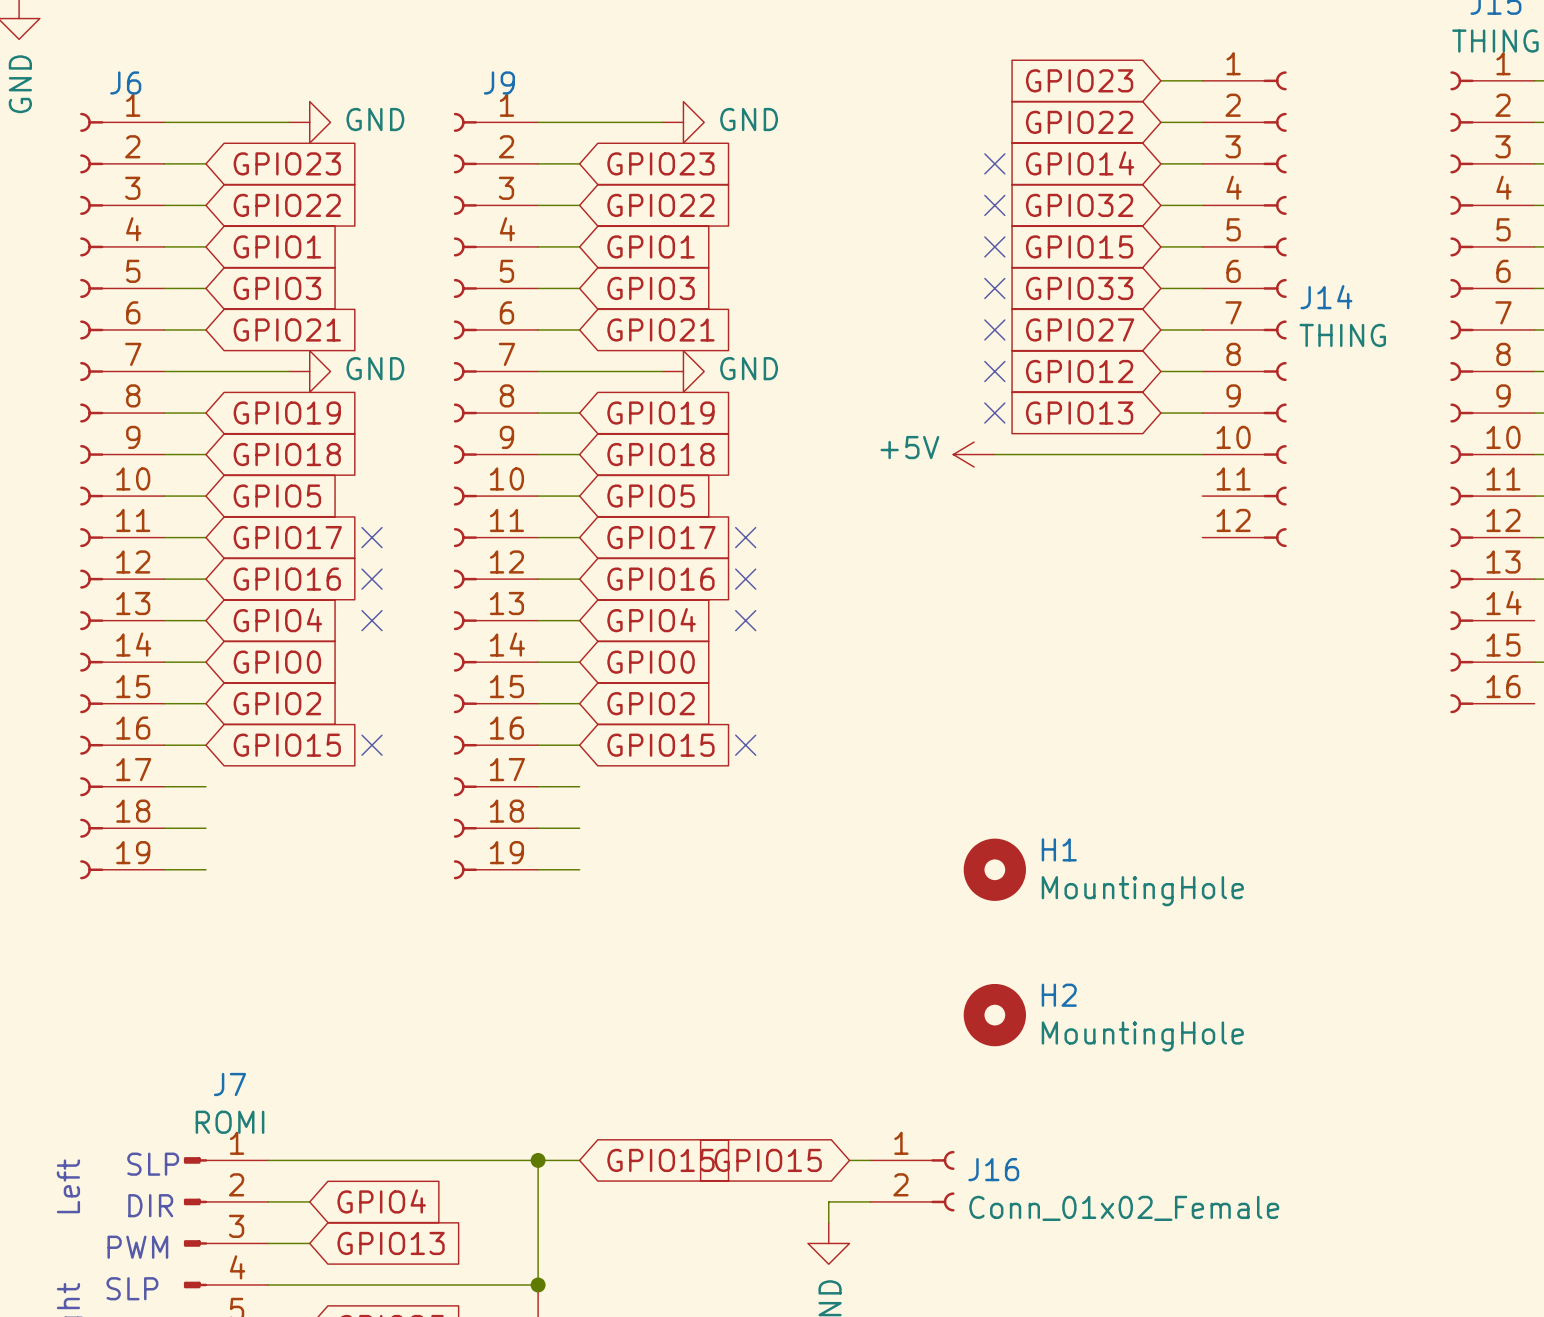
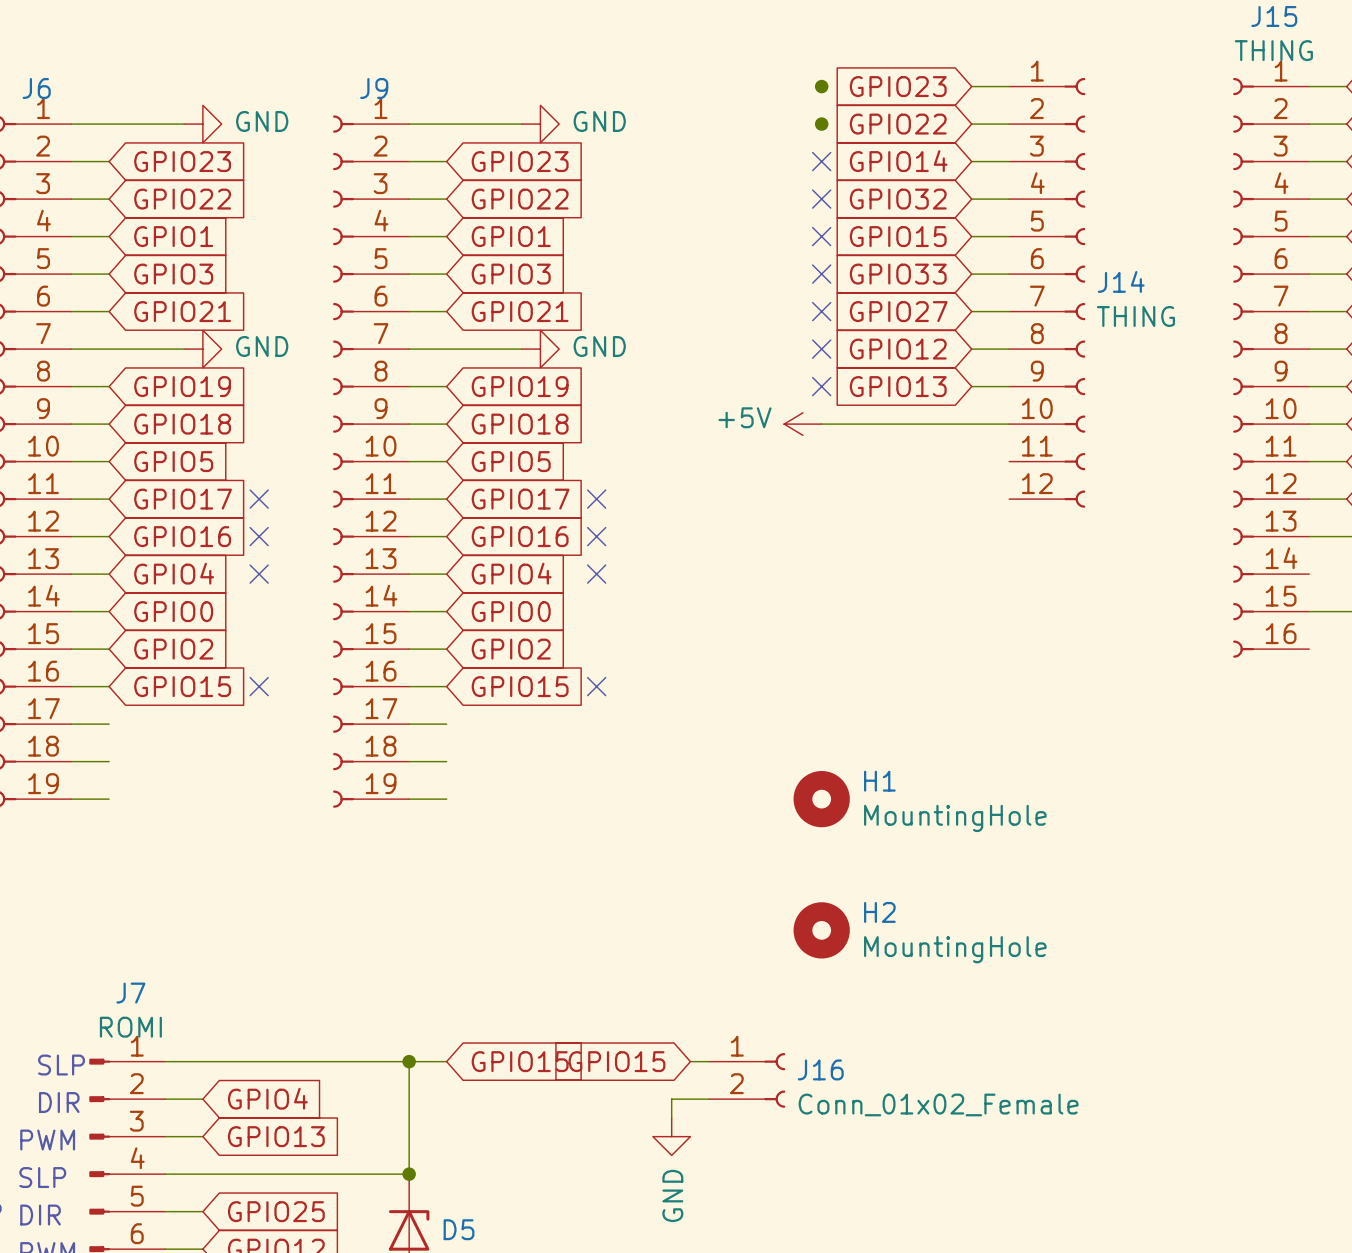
junction: none -> (821, 86)
junction: none -> (821, 124)

